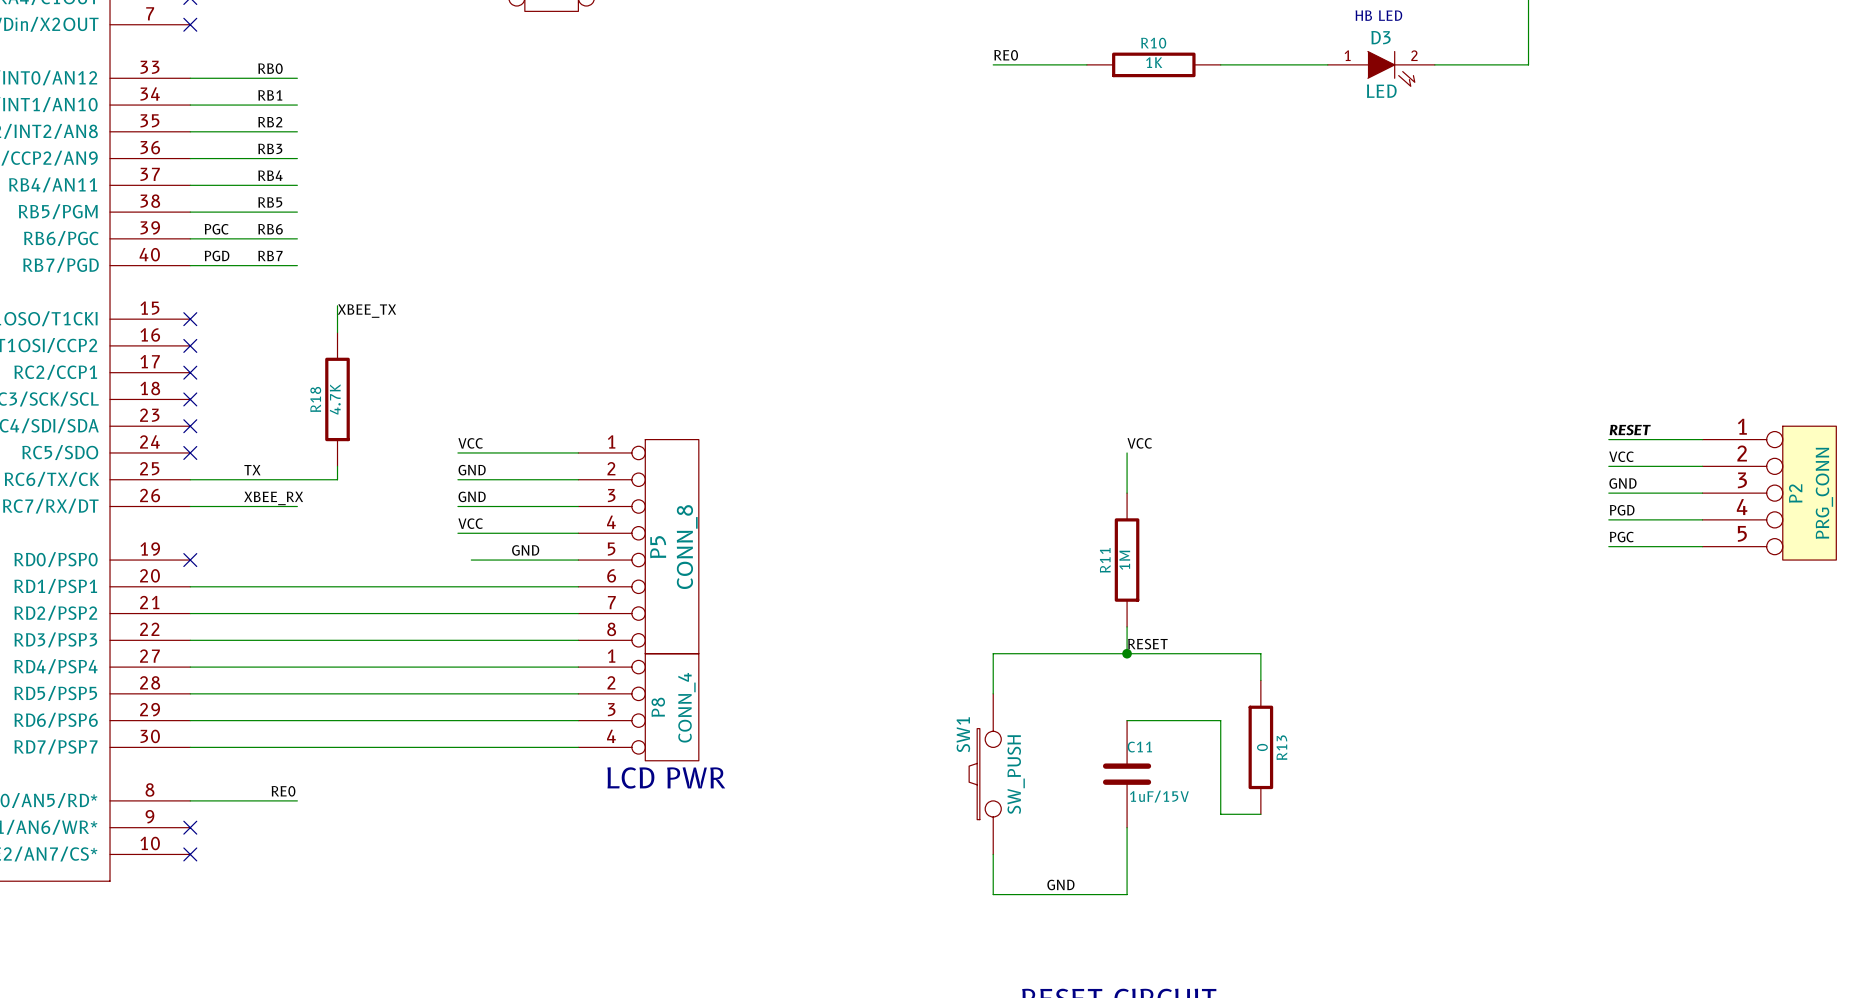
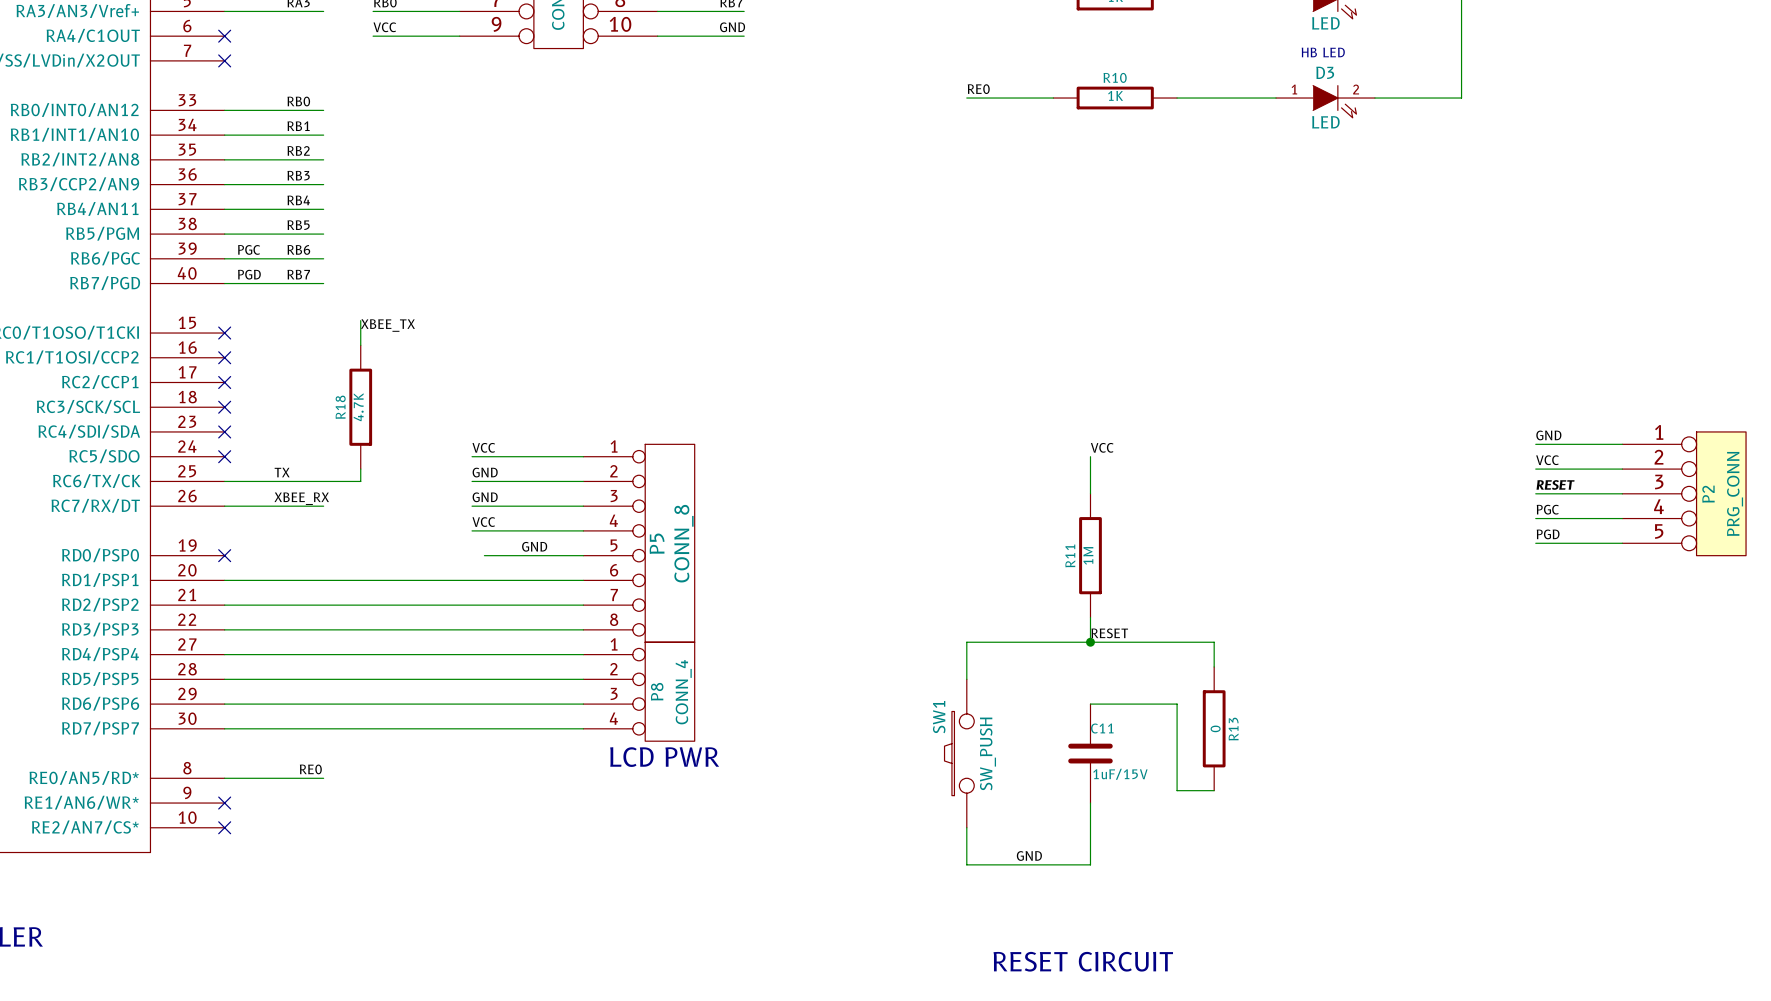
label: RESET (1630, 430) -> GND (1548, 435)
label: GND (1622, 483) -> RESET (1555, 484)
label: PGD (1622, 510) -> PGC (1547, 509)
label: PGC (1621, 537) -> PGD (1548, 534)

